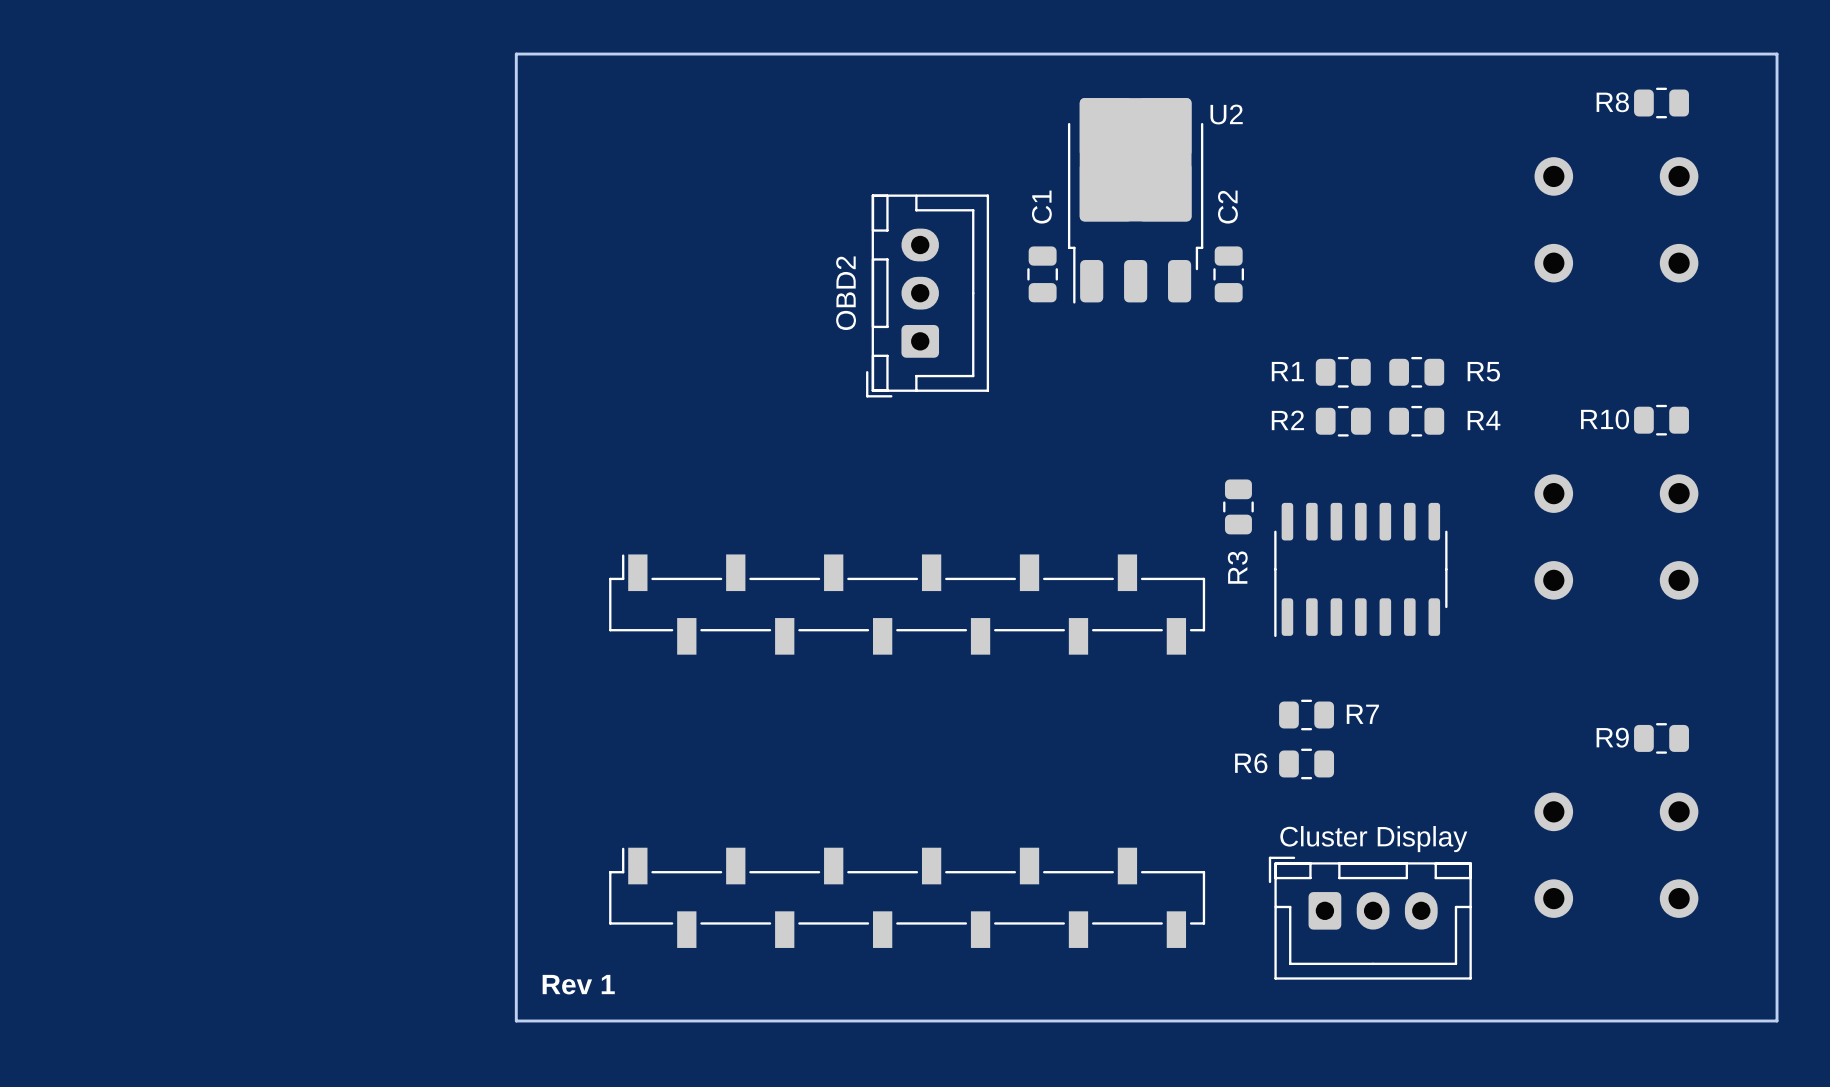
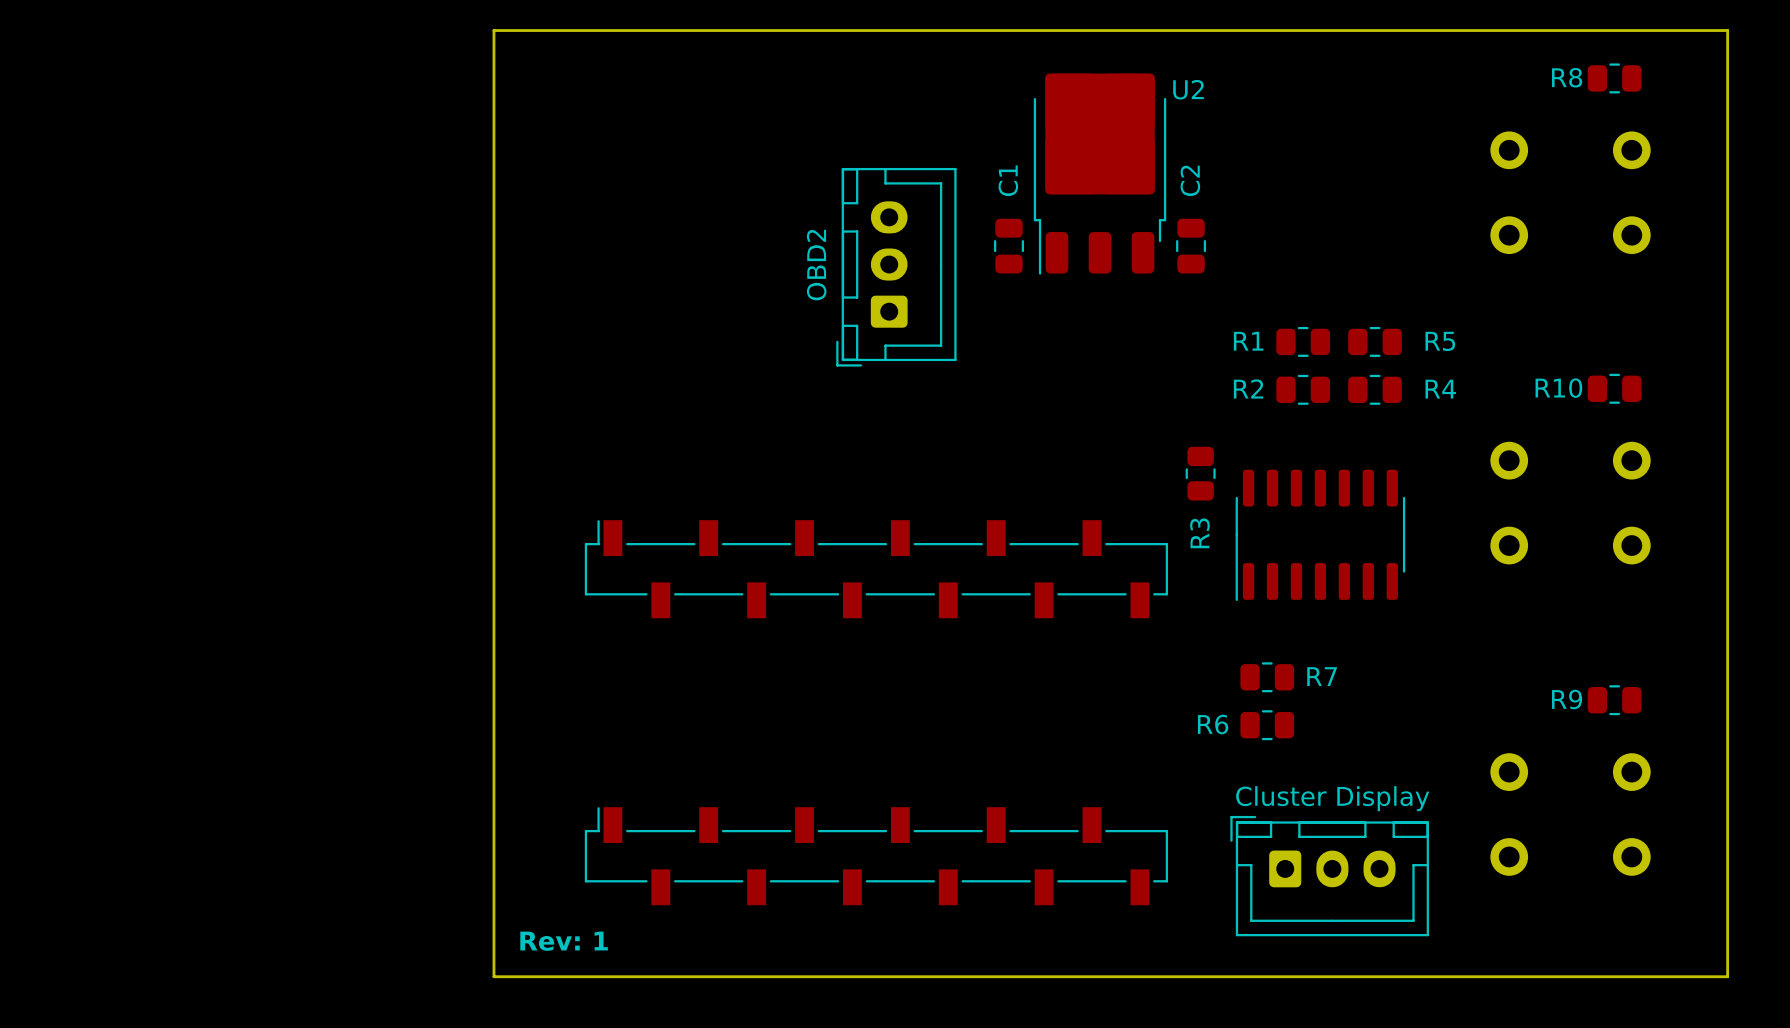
text: Rev 1 (578, 984) -> Rev: 1 (564, 941)

